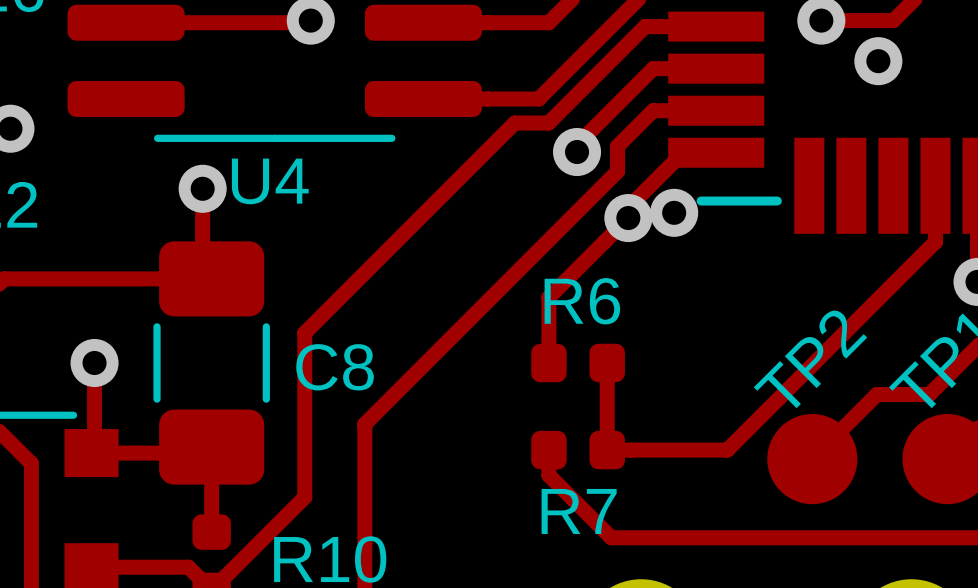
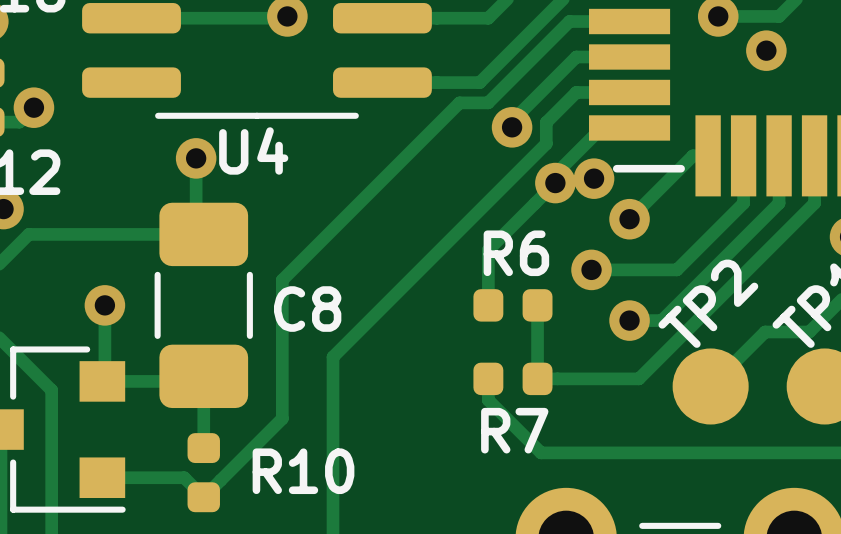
track: none -> (708, 155) (692, 155) (629, 219)
track: none -> (743, 155) (743, 203) (676, 269) (591, 269)
track: none -> (779, 155) (779, 203) (661, 320) (629, 320)
via: none -> (629, 219)
via: none -> (591, 269)
via: none -> (629, 320)

